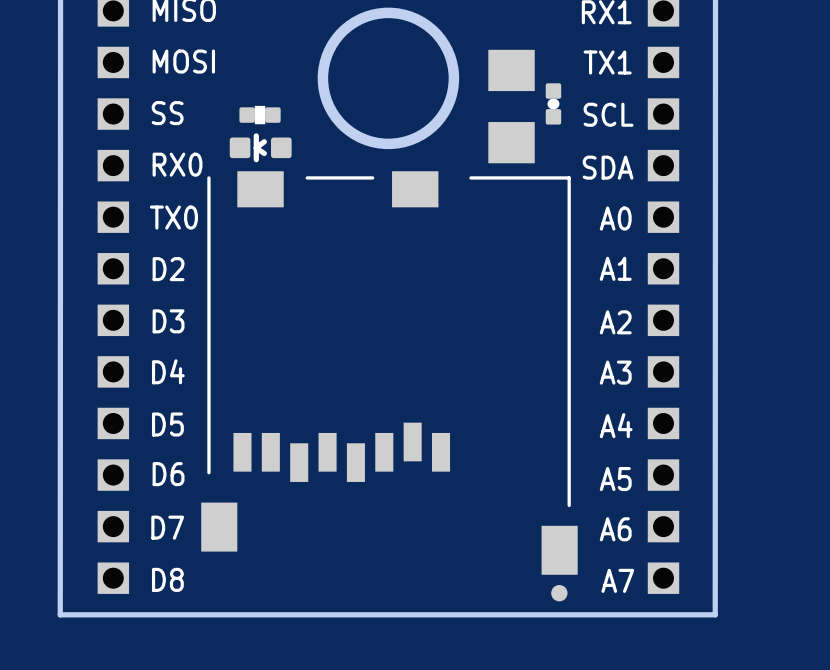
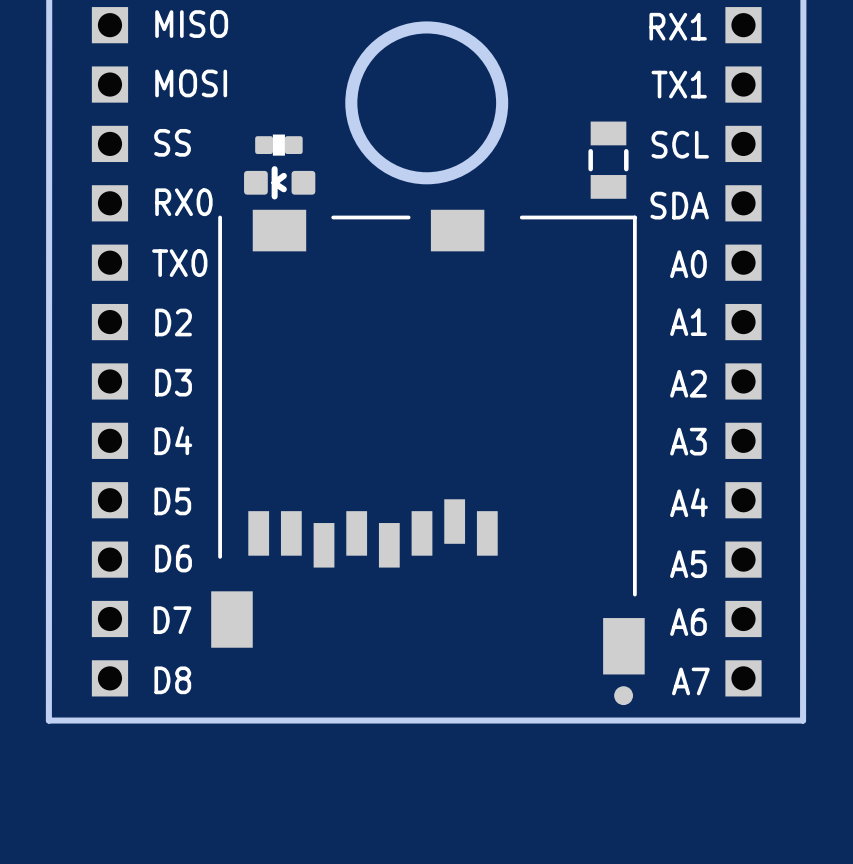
part: (553, 103) -> none
part: (511, 106) -> none
part: none -> (608, 160)

